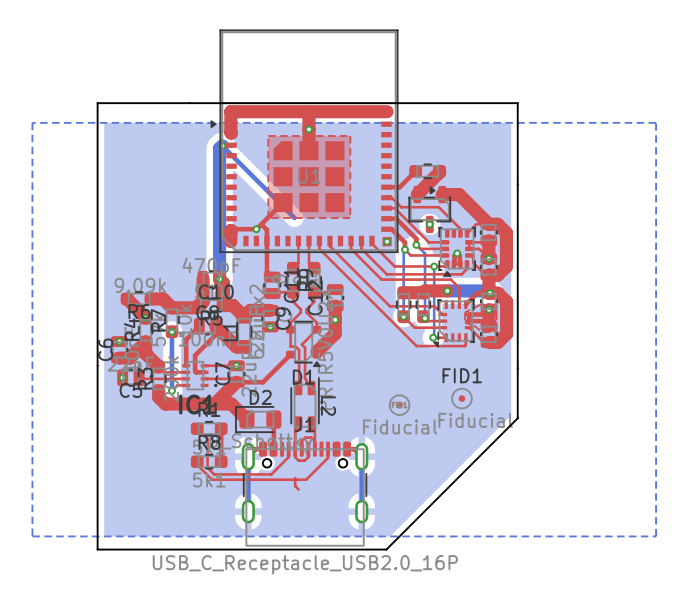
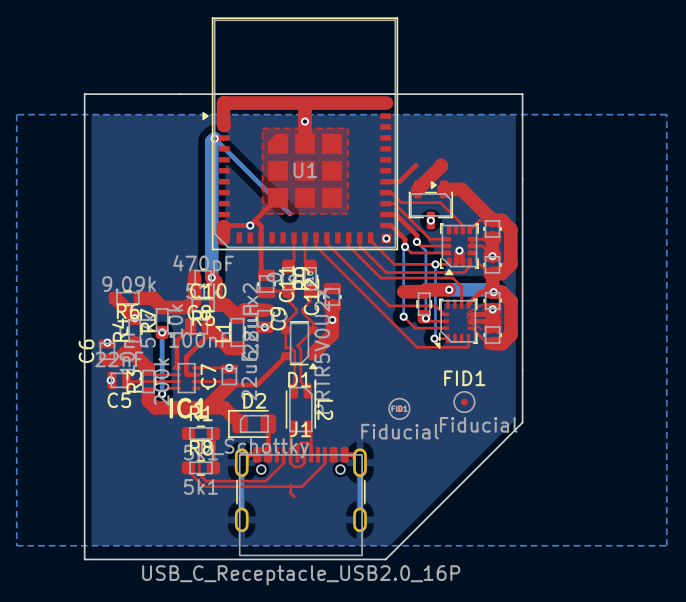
part: (427, 171) -> none
part: (403, 304) -> none
C6 footprint: [110, 336, 129, 364] -> [98, 339, 117, 364]
C7 footprint: [227, 360, 246, 388] -> [220, 364, 239, 389]
C5 footprint: [117, 368, 145, 387] -> [107, 371, 132, 390]

